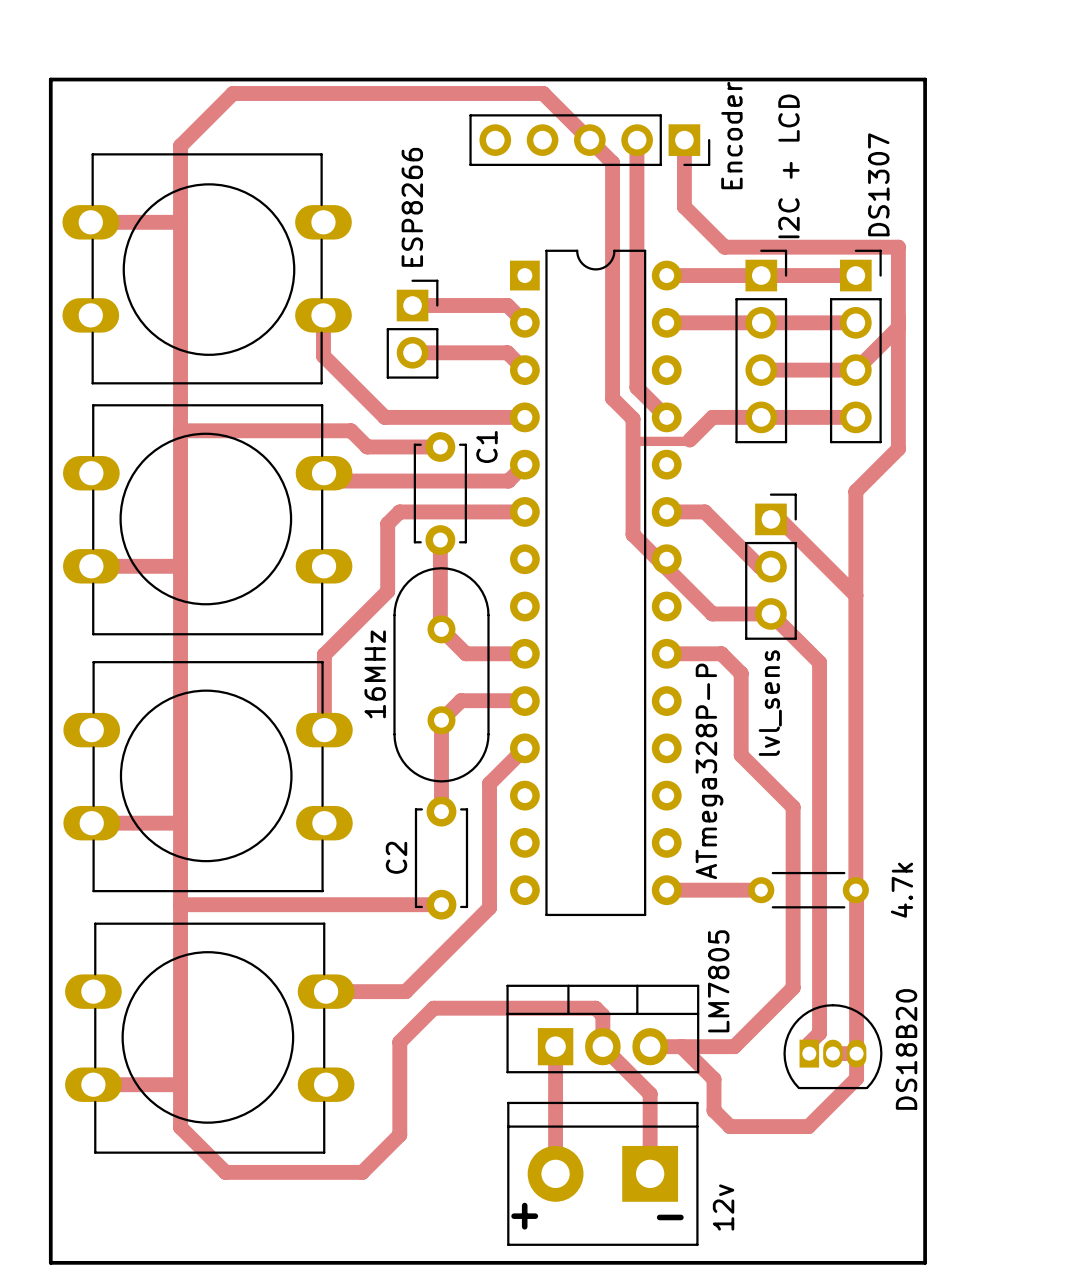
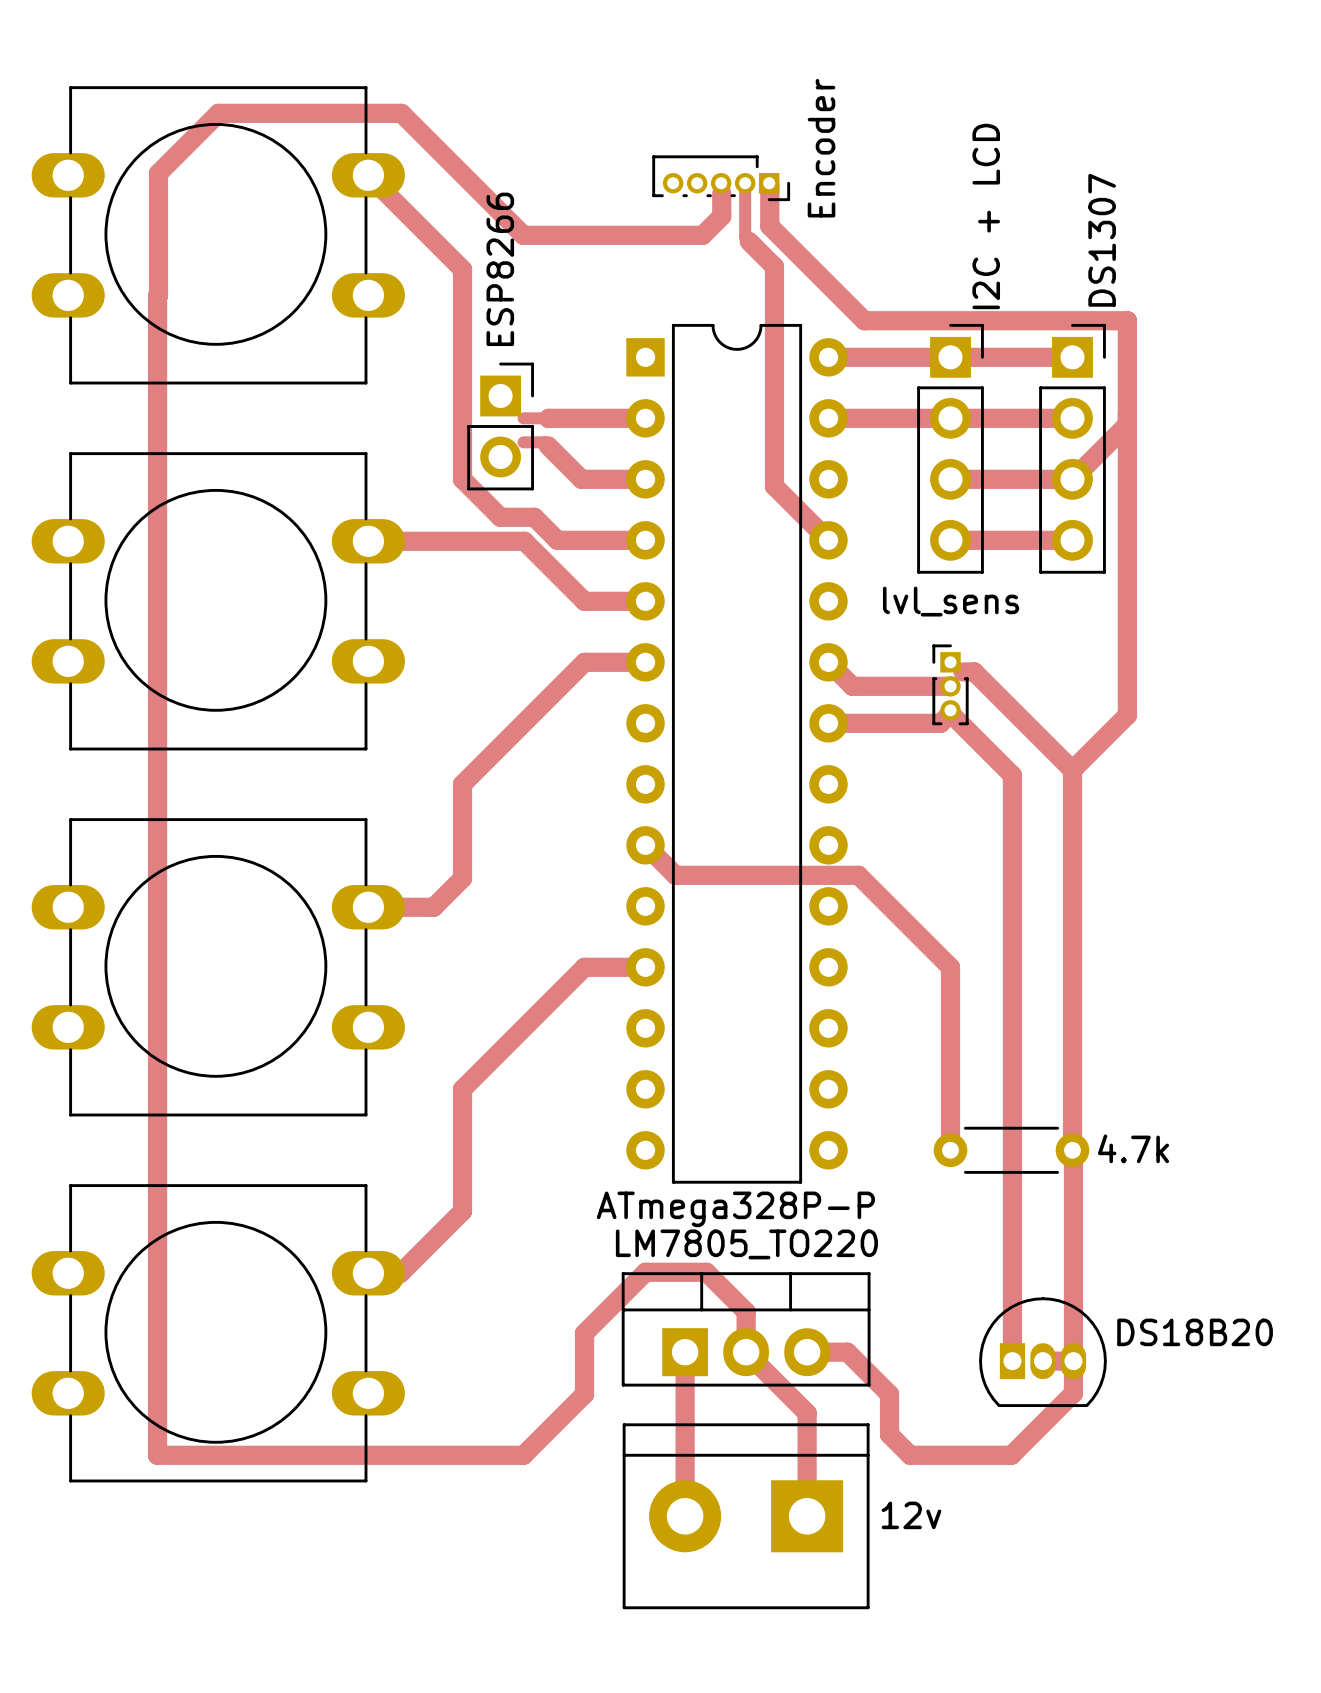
board edge: (50, 79) (925, 79) (925, 1262) (50, 1262) (50, 79) -> none
part footprint: [469, 114, 711, 167] -> [652, 155, 791, 202]
part value position: Encoder (731, 135) -> Encoder (821, 148)
track: (636, 140) (636, 387) -> (745, 183) (745, 237) (774, 266) (774, 486) (790, 501)
track: (684, 140) (684, 206) (724, 247) -> (769, 183) (769, 226) (864, 320) (903, 320)
track: none -> (721, 193) (721, 216) (702, 235) (523, 235) (401, 113) (218, 113) (158, 173) (157, 1455) (523, 1455) (584, 1394) (584, 1333) (645, 1272) (706, 1272) (736, 1302)
track: (180, 218) (177, 222) (90, 222) -> none
part rotation: 0° (207, 268) -> 180° (218, 235)
track: (412, 305) (507, 305) (524, 322) -> (548, 418) (645, 418)
track: (323, 315) (323, 355) (384, 417) (456, 417) -> (368, 175) (462, 269) (462, 479) (500, 517) (534, 517) (557, 540)
track: none -> (523, 418) (548, 418)
track: (412, 352) (507, 352) (524, 370) -> (523, 442) (544, 442) (581, 479) (645, 479)
track: (761, 417) (712, 417) (688, 441) (633, 441) -> none
track: (180, 430) (351, 430) (367, 446) (440, 446) -> none
track: (898, 448) (855, 491) (855, 595) -> (1127, 581) (1127, 715) (1072, 770)
track: (524, 464) (508, 481) (331, 481) (324, 473) -> (645, 601) (584, 601) (524, 541) (368, 541)
C1: (440, 493) -> none
track: (477, 511) (399, 511) (387, 523) (387, 591) (324, 654) (324, 730) -> (584, 662) (462, 784) (462, 878) (433, 907) (368, 907)
track: (666, 511) (704, 511) (759, 566) (770, 566) -> (828, 662) (852, 686) (950, 686)
part position: (207, 519) -> (218, 601)
part: none -> lvl_sens (950, 684)
track: (440, 540) (440, 628) (465, 653) (524, 653) (520, 649) -> none
track: (91, 566) (176, 566) (180, 570) -> none
part: lvl_sens (770, 566) -> none
track: (666, 653) (721, 653) (741, 673) (741, 755) (793, 807) (793, 987) (734, 1046) (681, 1046) -> none
part: 16MHz (441, 674) -> none
track: (524, 701) (461, 700) (441, 720) (441, 811) -> none
track: (524, 748) (489, 783) (489, 907) (405, 991) (326, 991) -> (645, 967) (584, 967) (462, 1089) (462, 1211) (400, 1273) (368, 1273)
part value rotation: 0° (709, 771) -> 90° clockwise (735, 1209)
part position: (208, 776) -> (218, 967)
track: (180, 822) (91, 823) -> none
C2: (441, 858) -> none
track: (666, 890) (761, 890) -> (645, 845) (675, 875) (858, 875) (950, 967) (950, 1150)
part value rotation: 0° (901, 890) -> 90° clockwise (1133, 1148)
track: (441, 904) (180, 905) -> none
part value: LM7805 (718, 981) -> LM7805_TO220 (746, 1244)
track: (595, 1008) (433, 1008) (399, 1042) (399, 1134) (362, 1172) (225, 1172) (180, 1127) (180, 145) (233, 93) (543, 93) (612, 162) (612, 398) (633, 418) (633, 534) (712, 613) (770, 613) (819, 662) (819, 1033) (809, 1043) -> (828, 723) (940, 723) (950, 713) (1012, 775) (1012, 1348)
part position: (209, 1038) -> (218, 1333)
part value rotation: 0° (906, 1049) -> 90° clockwise (1195, 1332)
track: (93, 1084) (180, 1085) -> none
part value rotation: 0° (723, 1207) -> 90° clockwise (911, 1515)
text: + (524, 1216) -> none
text: - (670, 1217) -> none

